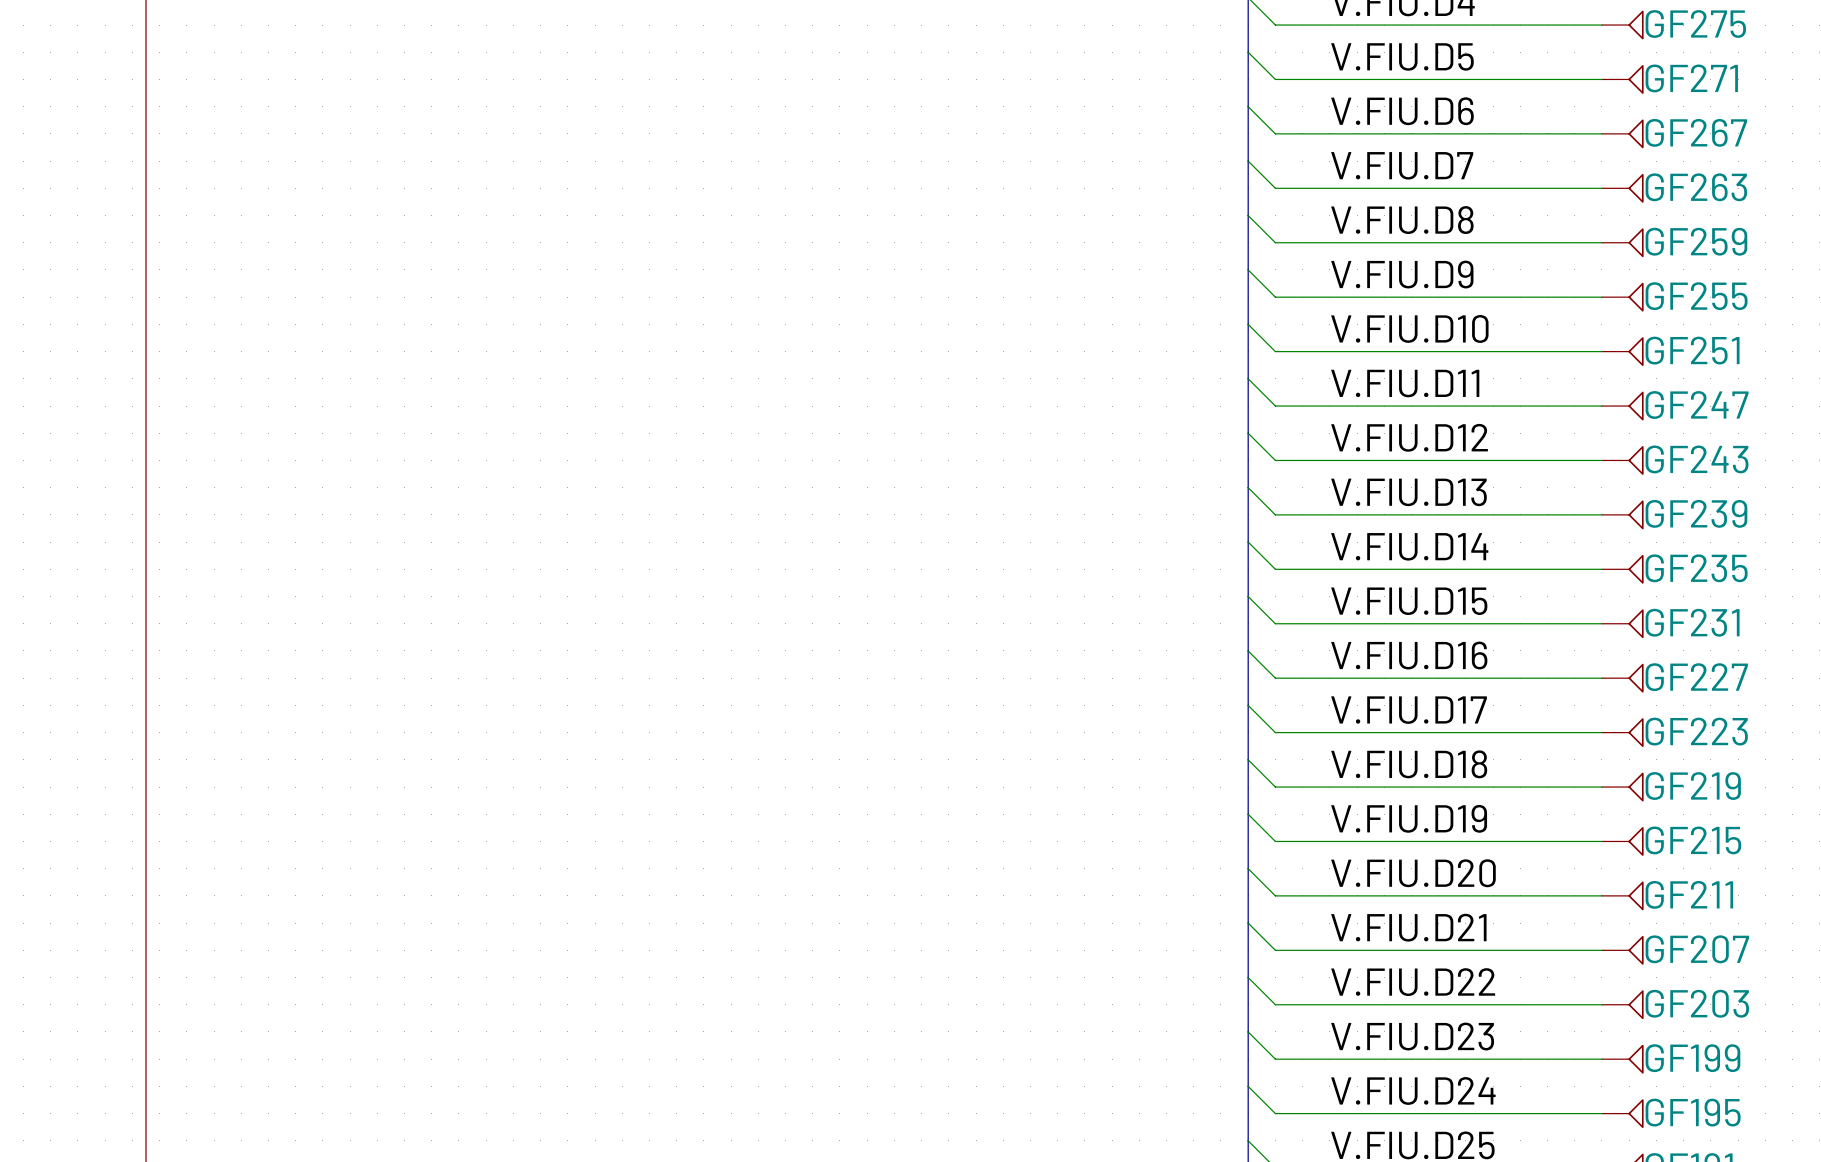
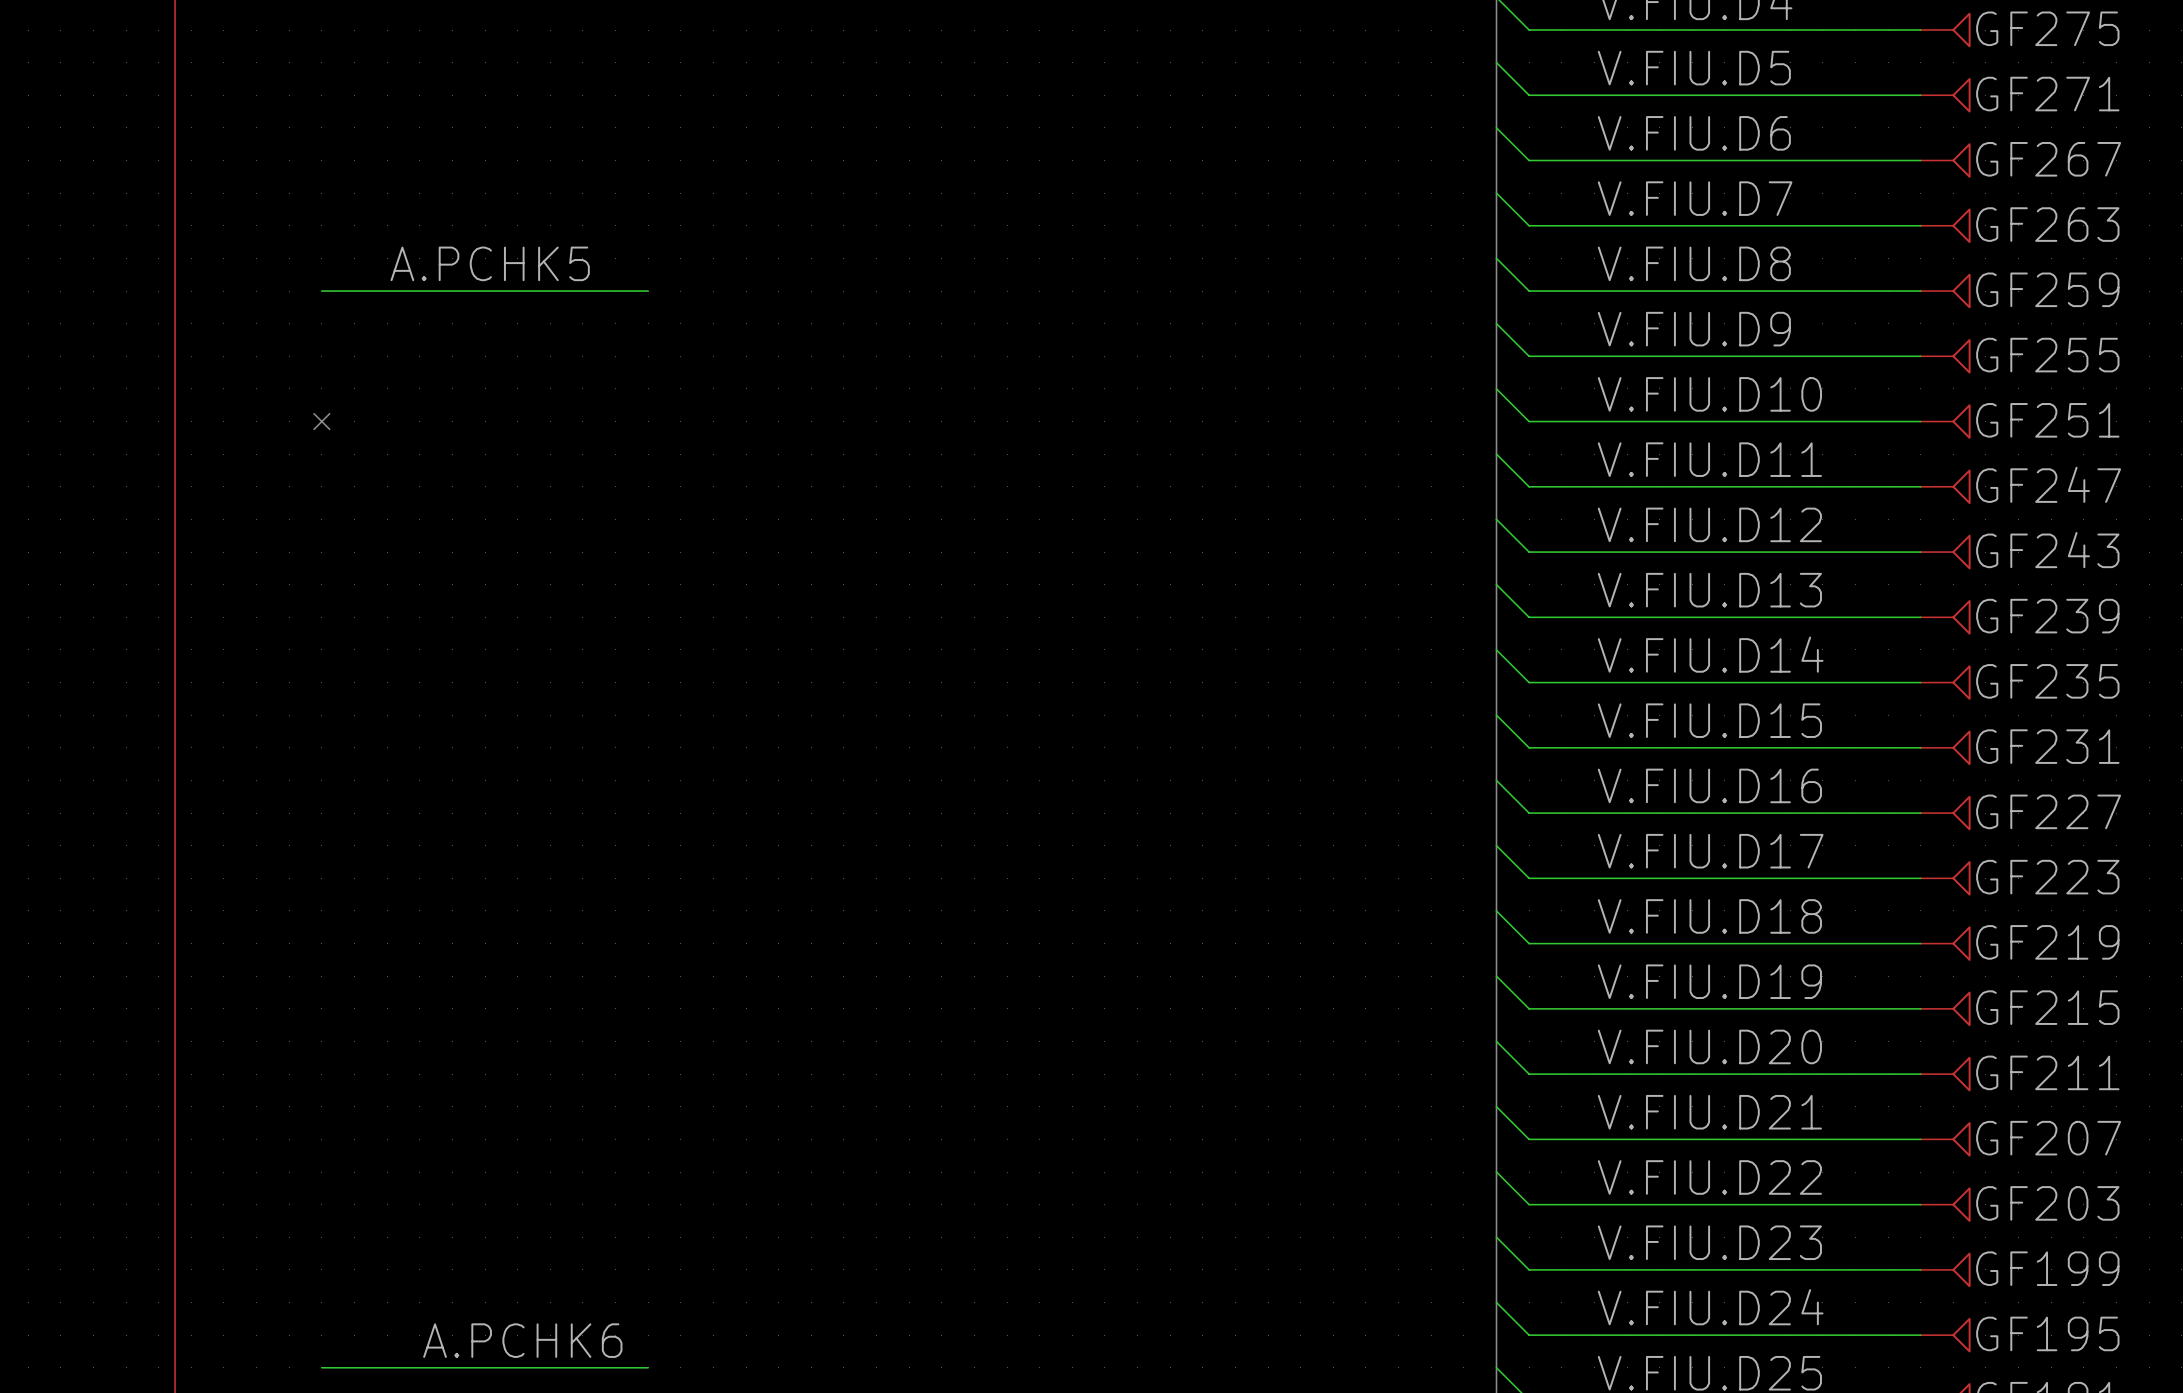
label: none -> A.PCHK5 (490, 263)
wire: none -> (321, 291) (648, 291)
no-connect mark: none -> (321, 421)
label: none -> A.PCHK6 (522, 1340)
wire: none -> (321, 1367) (648, 1367)

